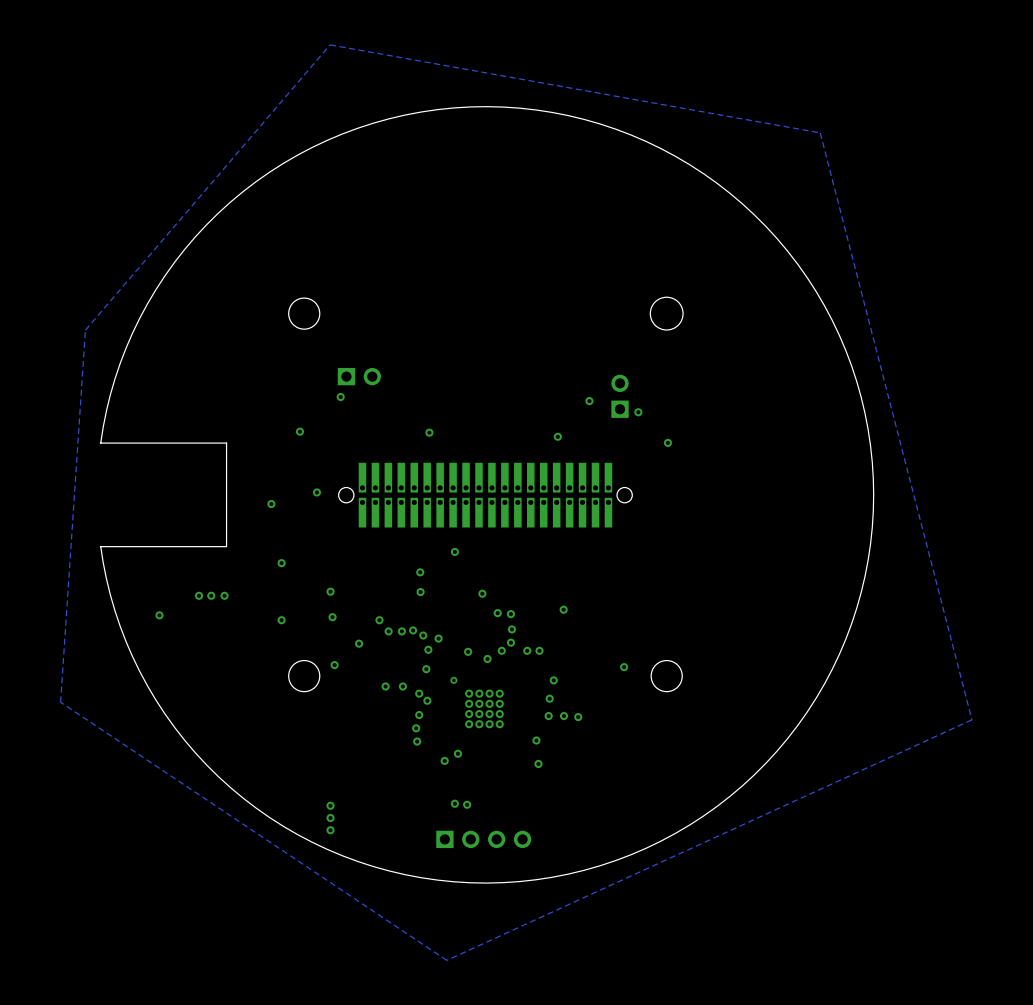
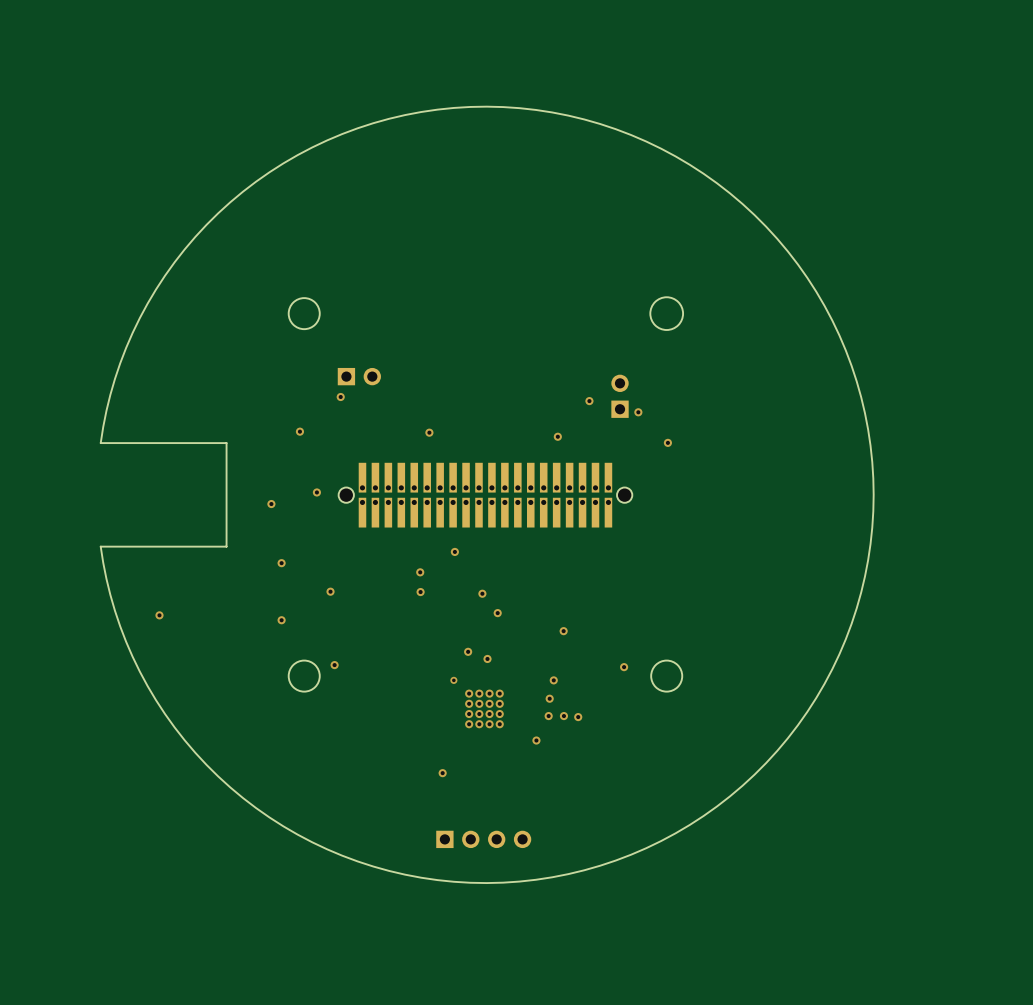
zone outline: (330, 44) (85, 330) (60, 702) (446, 960) (971, 719) (820, 132) (330, 44) -> none
via: (199, 595) -> none
via: (211, 595) -> none
via: (224, 595) -> none
via: (563, 609) -> none
via: (510, 614) -> none
via: (332, 617) -> none
via: (379, 620) -> none
via: (511, 629) -> none
via: (413, 630) -> none
via: (388, 631) -> none
via: (401, 631) -> none
via: none -> (563, 631)
via: (423, 635) -> none
via: (438, 638) -> none
via: (510, 642) -> none
via: (359, 643) -> none
via: (428, 649) -> none
via: (501, 650) -> none
via: (527, 650) -> none
via: (539, 650) -> none
via: (426, 669) -> none
via: (385, 686) -> none
via: (402, 686) -> none
via: (419, 693) -> none
via: (427, 700) -> none
via: (419, 715) -> none
via: (416, 728) -> none
via: (417, 741) -> none
via: (457, 753) -> none
via: (444, 760) -> none
via: (538, 763) -> none
via: none -> (442, 773)
via: (454, 803) -> none
via: (467, 804) -> none
via: (330, 805) -> none
via: (330, 817) -> none
via: (330, 830) -> none

